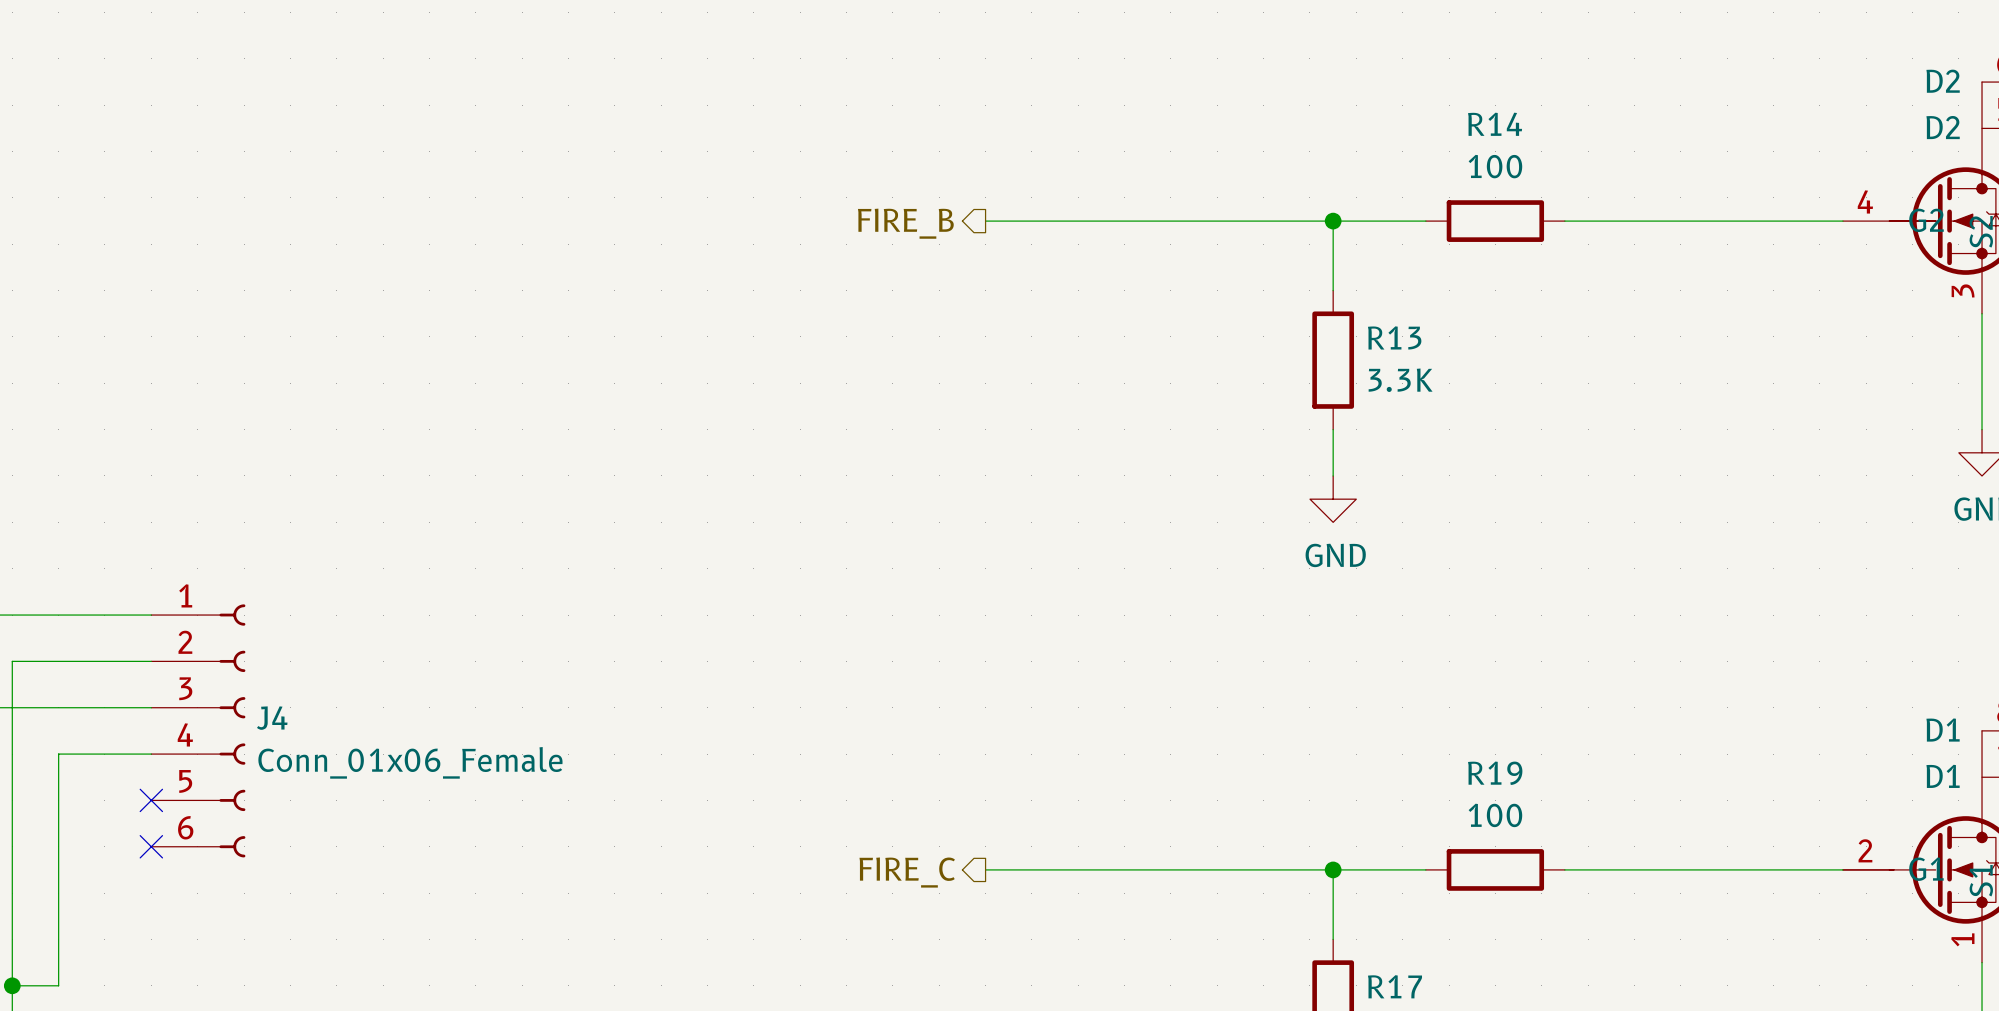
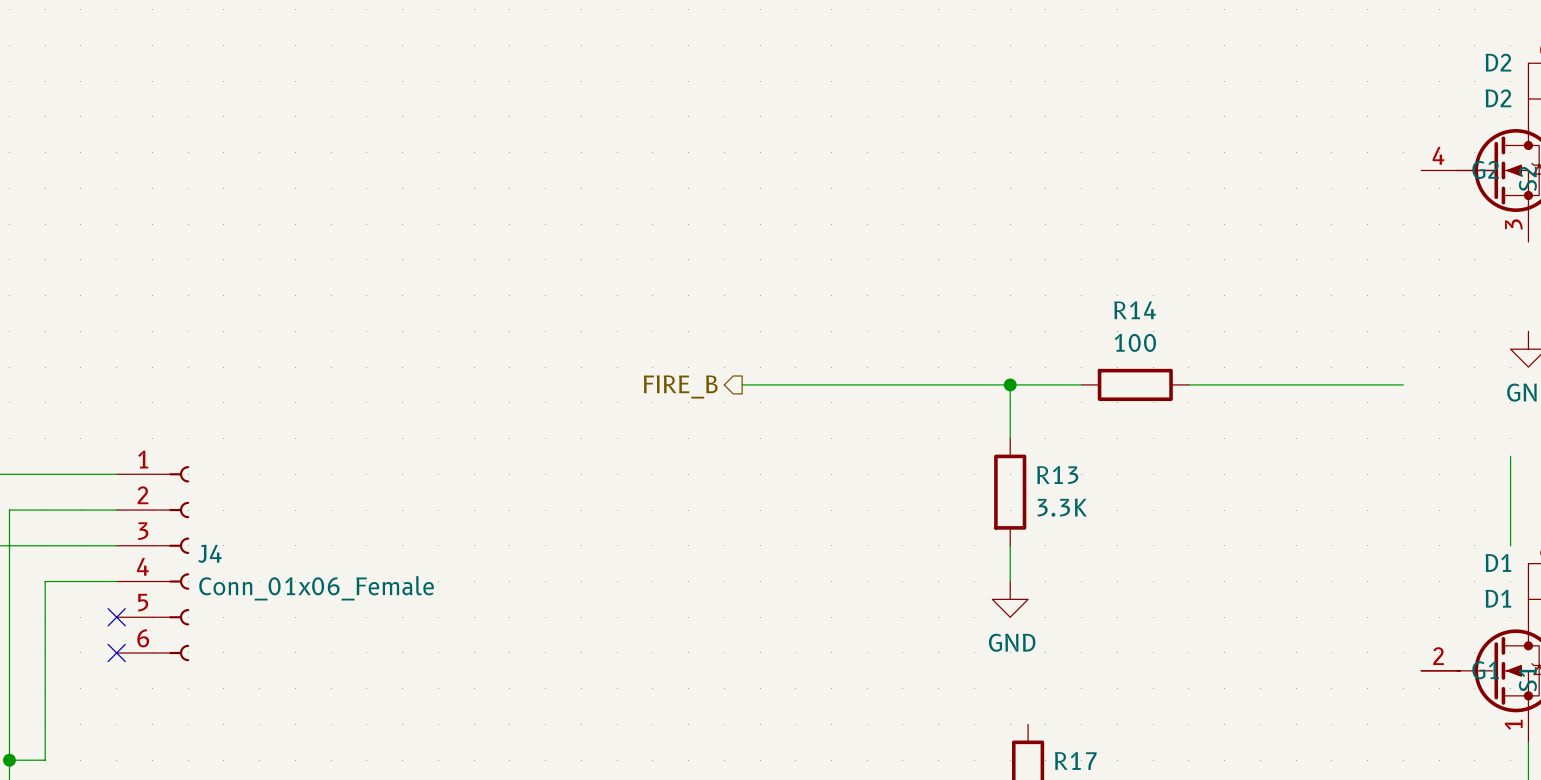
wire: (985, 221) (1425, 221) -> (742, 384) (1081, 384)
wire: (1333, 221) (1333, 290) -> (1010, 384) (1010, 438)
junction: (1333, 221) -> none
R14 position: (1495, 221) -> (1135, 384)
wire: (1564, 221) (1842, 221) -> (1188, 384) (1403, 384)
hierarchical label position: FIRE_B (905, 223) -> FIRE_B (680, 386)
wire: (1982, 313) (1982, 429) -> (1510, 456) (1510, 545)
R13 position: (1333, 360) -> (1010, 492)
wire: (1333, 429) (1333, 475) -> (1010, 545) (1010, 581)
junction: none -> (1010, 384)
power symbol position: GND (1333, 499) -> GND (1010, 599)
wire: (985, 869) (1425, 869) -> none
wire: (1333, 869) (1333, 939) -> none
junction: (1333, 869) -> none
R19: 100 (1495, 869) -> none
wire: (1564, 869) (1842, 869) -> none
hierarchical label: FIRE_C (907, 872) -> none

